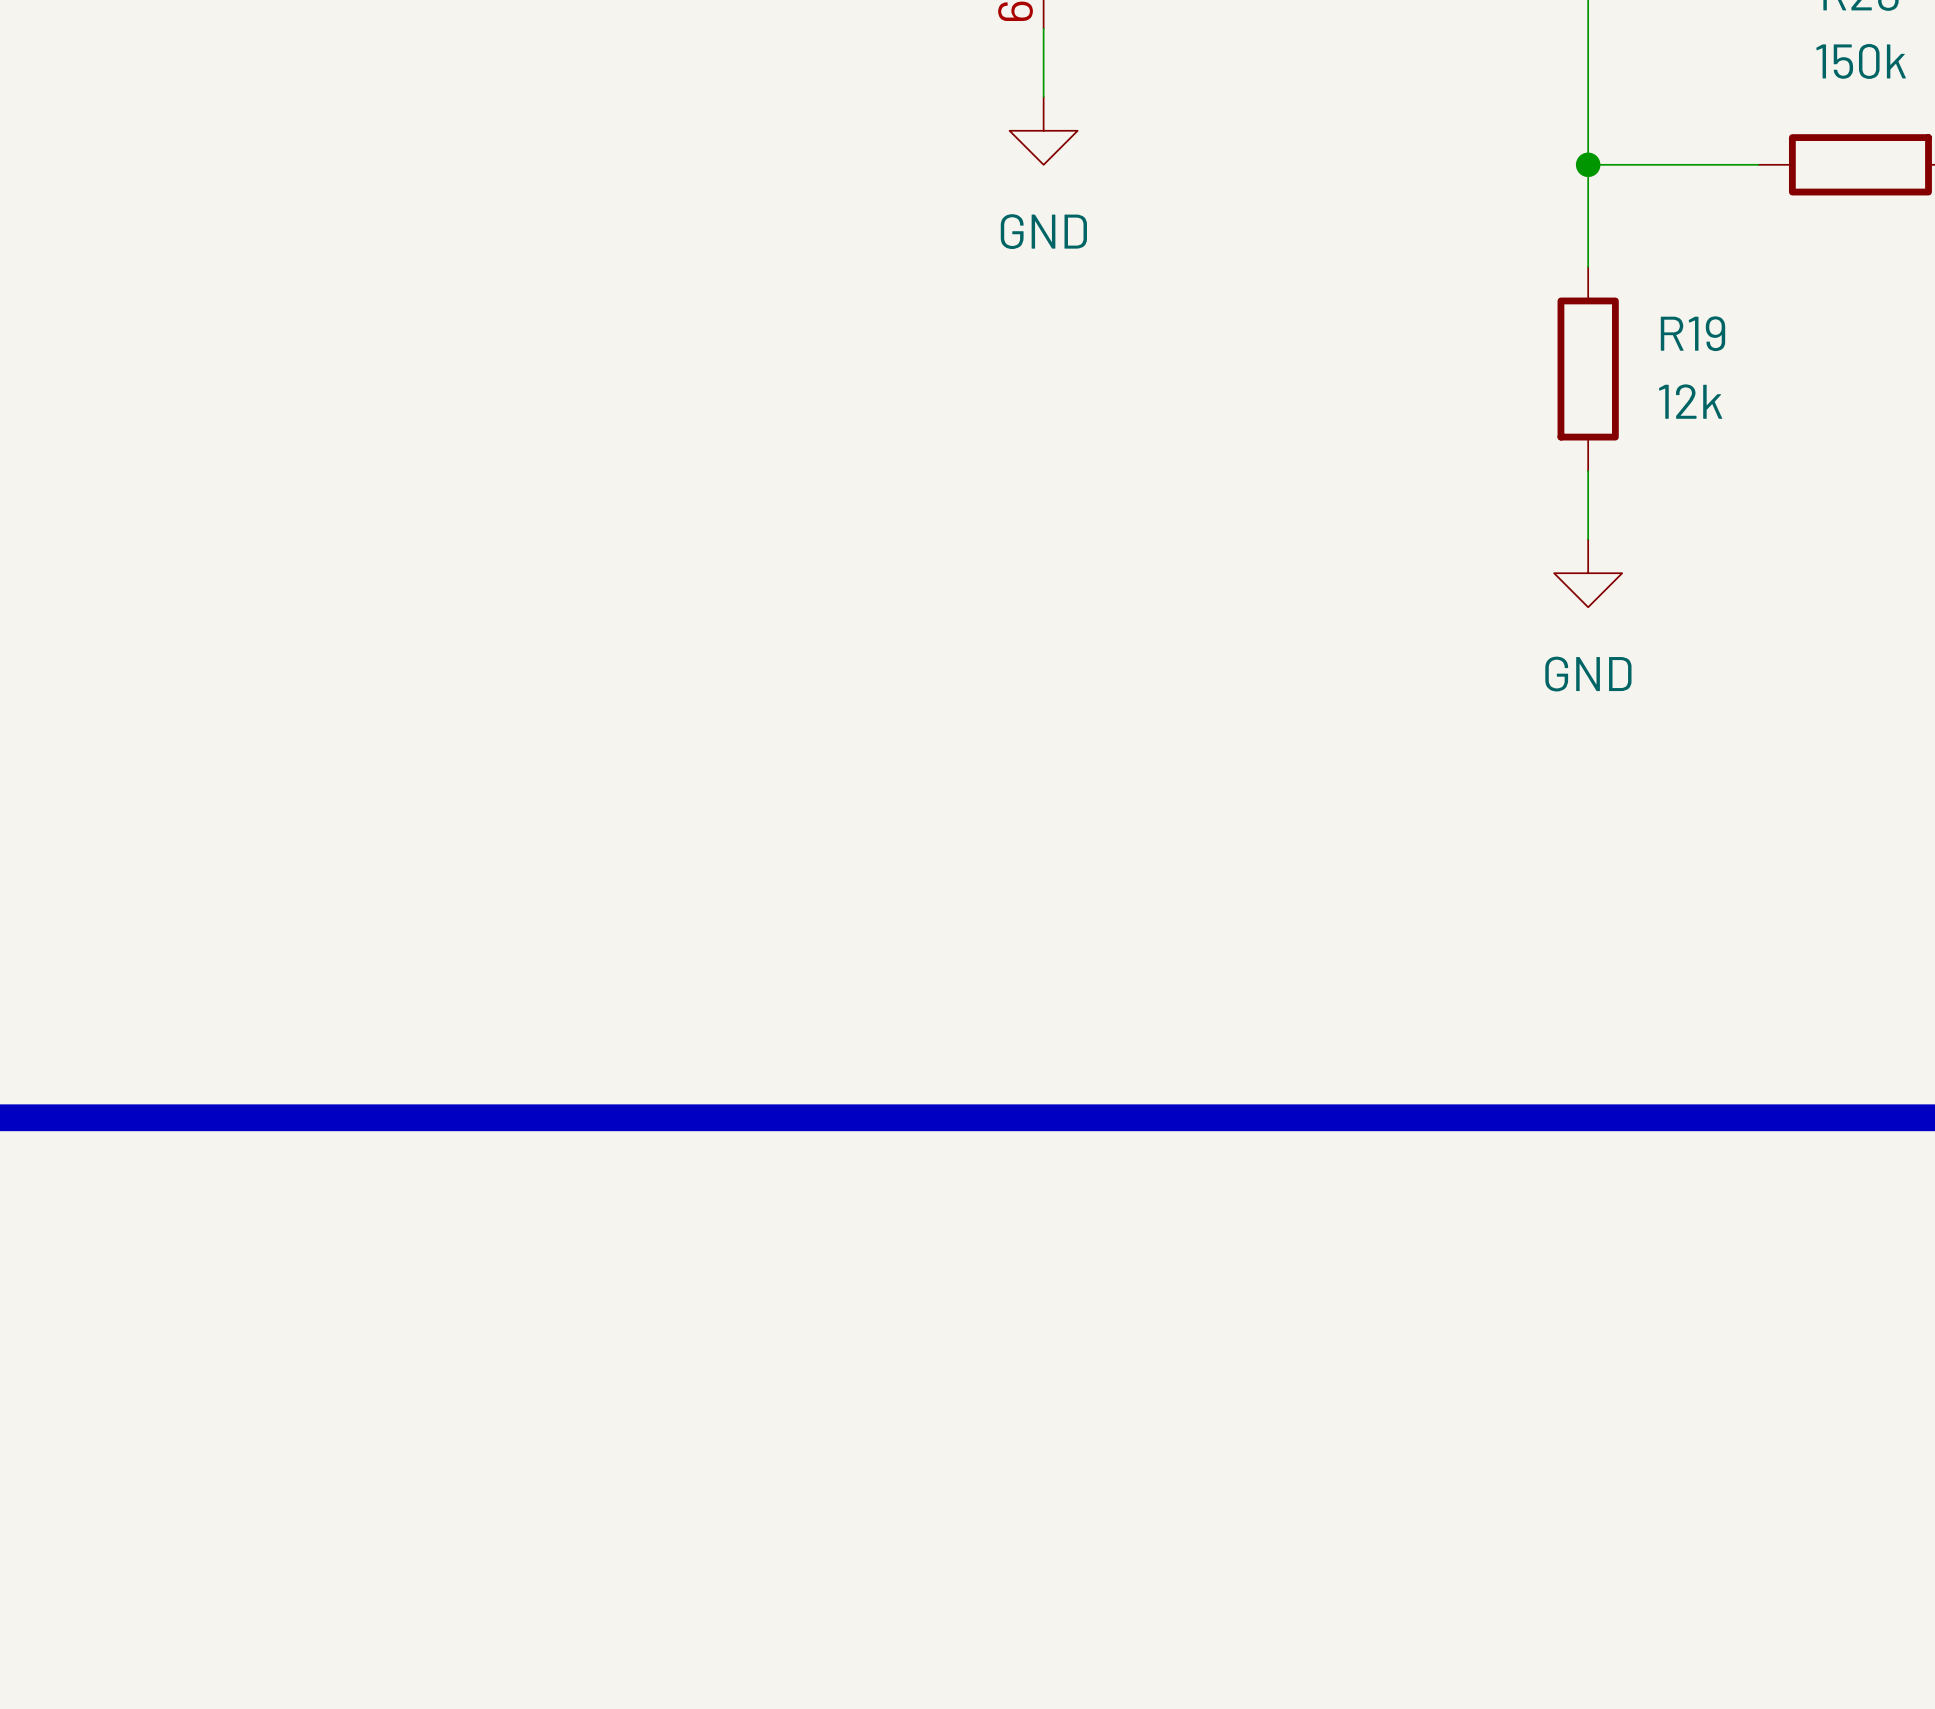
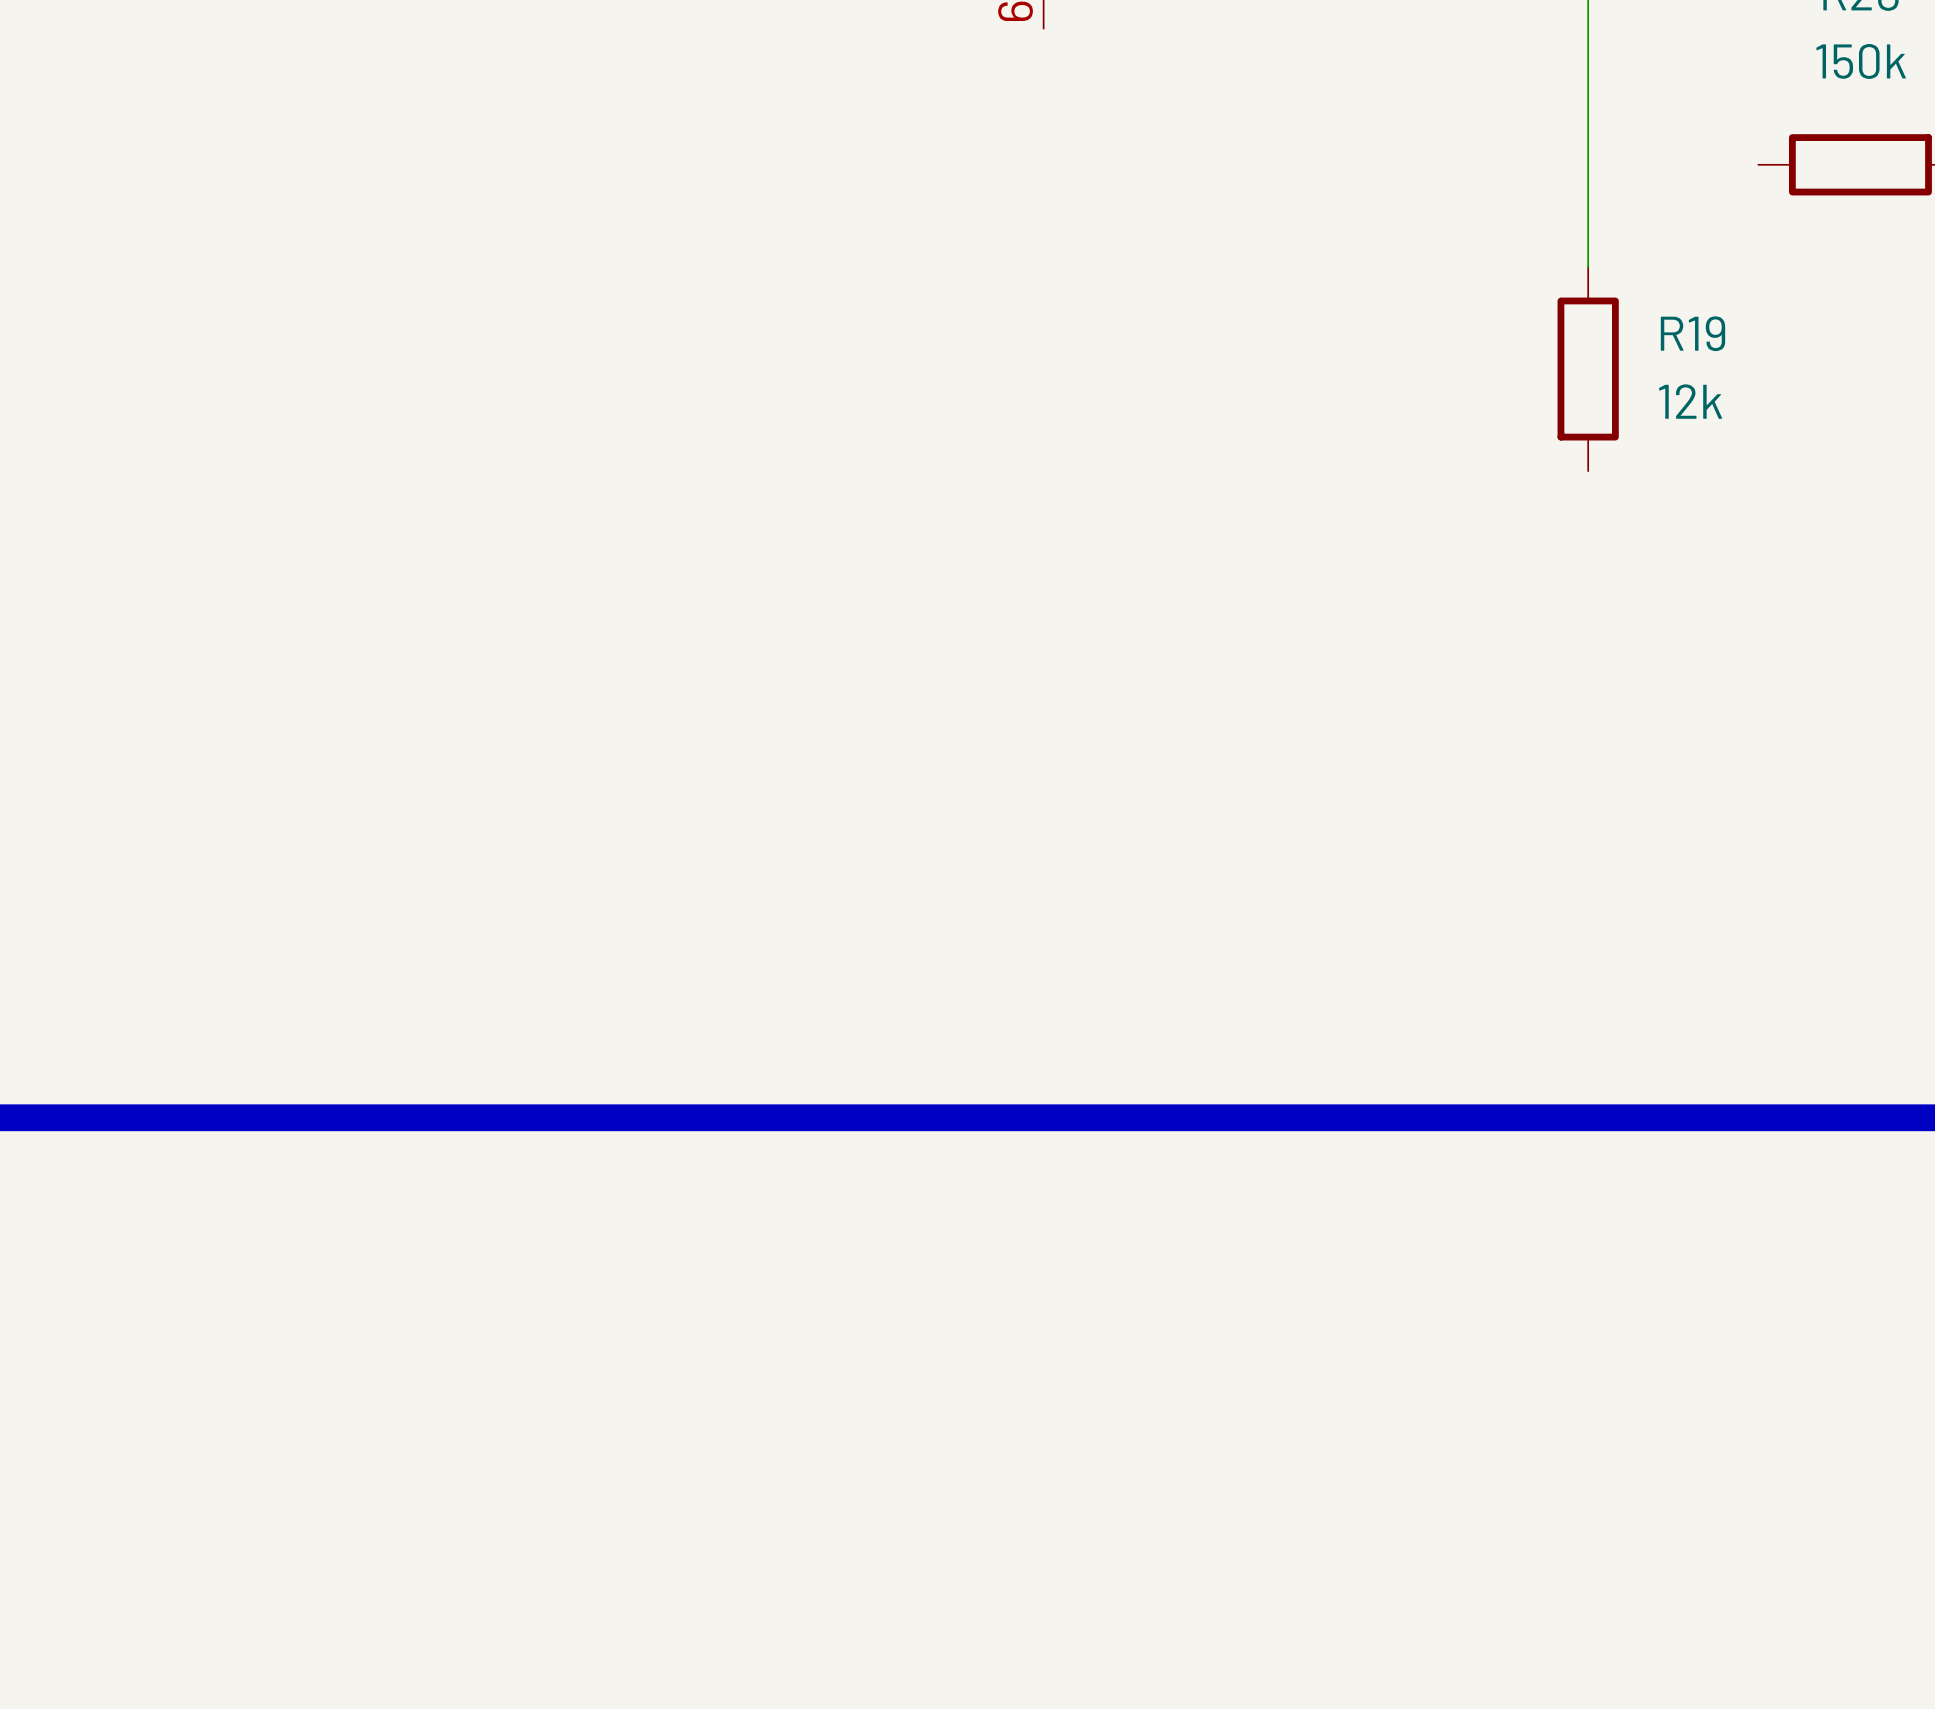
wire: (1043, 28) (1043, 96) -> none
power symbol: GND (1043, 130) -> none
wire: (1588, 164) (1758, 164) -> none
junction: (1588, 164) -> none
wire: (1588, 471) (1588, 539) -> none
power symbol: GND (1588, 573) -> none

